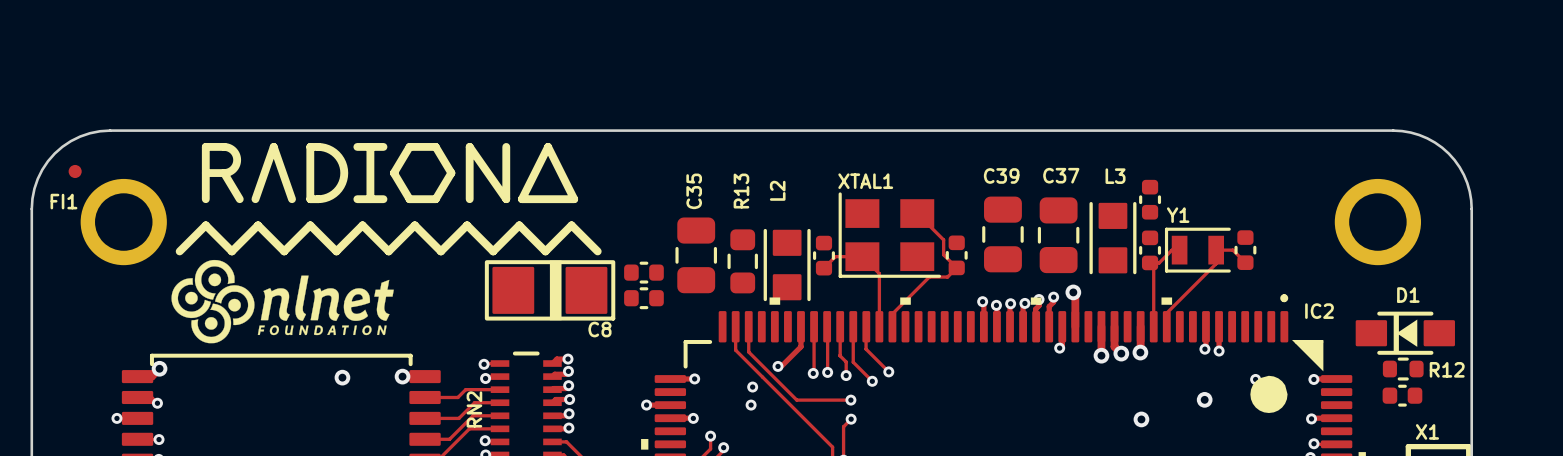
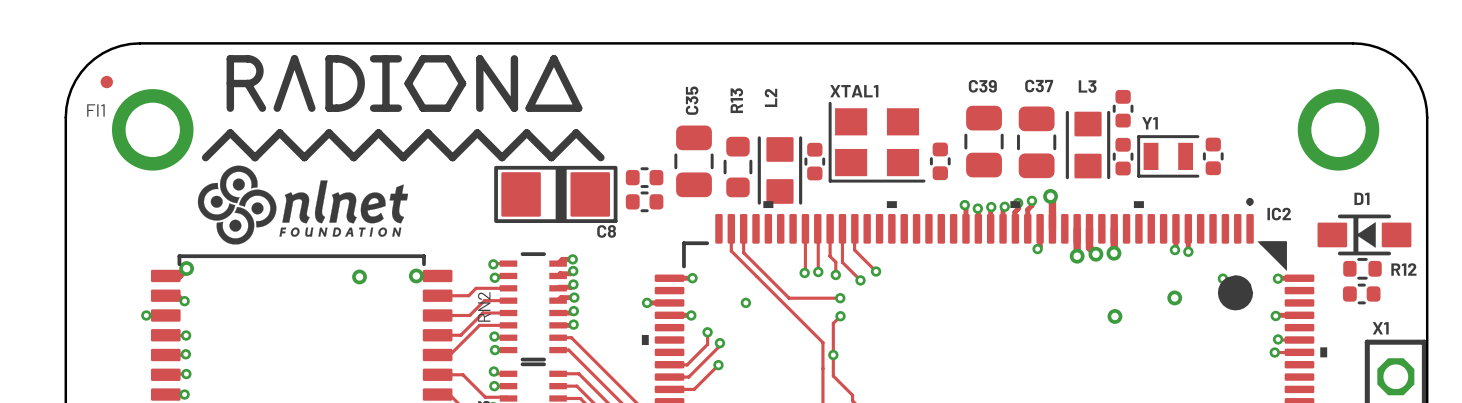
track: (917, 213) (943, 239) (943, 254) (956, 267) (947, 277) (929, 277) (892, 313) (892, 326) -> none
track: (1179, 250) (1172, 250) (1159, 262) (1150, 262) (1153, 266) (1153, 326) -> none
track: (1245, 262) (1232, 250) (1216, 250) (1216, 263) (1166, 313) (1166, 326) -> none
track: (823, 268) (835, 256) (862, 256) (879, 273) (879, 326) -> none
track: (800, 326) (800, 346) (781, 366) -> none
via: (778, 366) -> none
via: (752, 387) -> none

